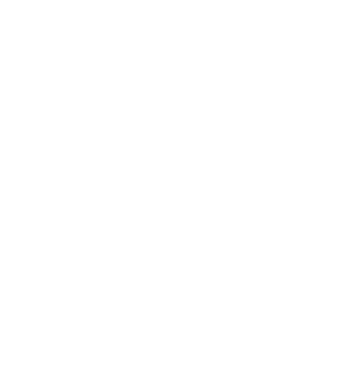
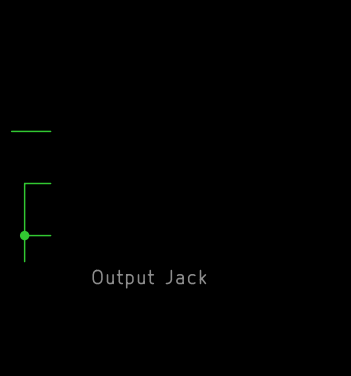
wire: none -> (11, 131) (50, 131)
wire: none -> (50, 183) (24, 183) (24, 261)
wire: none -> (24, 235) (50, 235)
junction: none -> (24, 235)
text: none -> Output Jack (149, 279)

